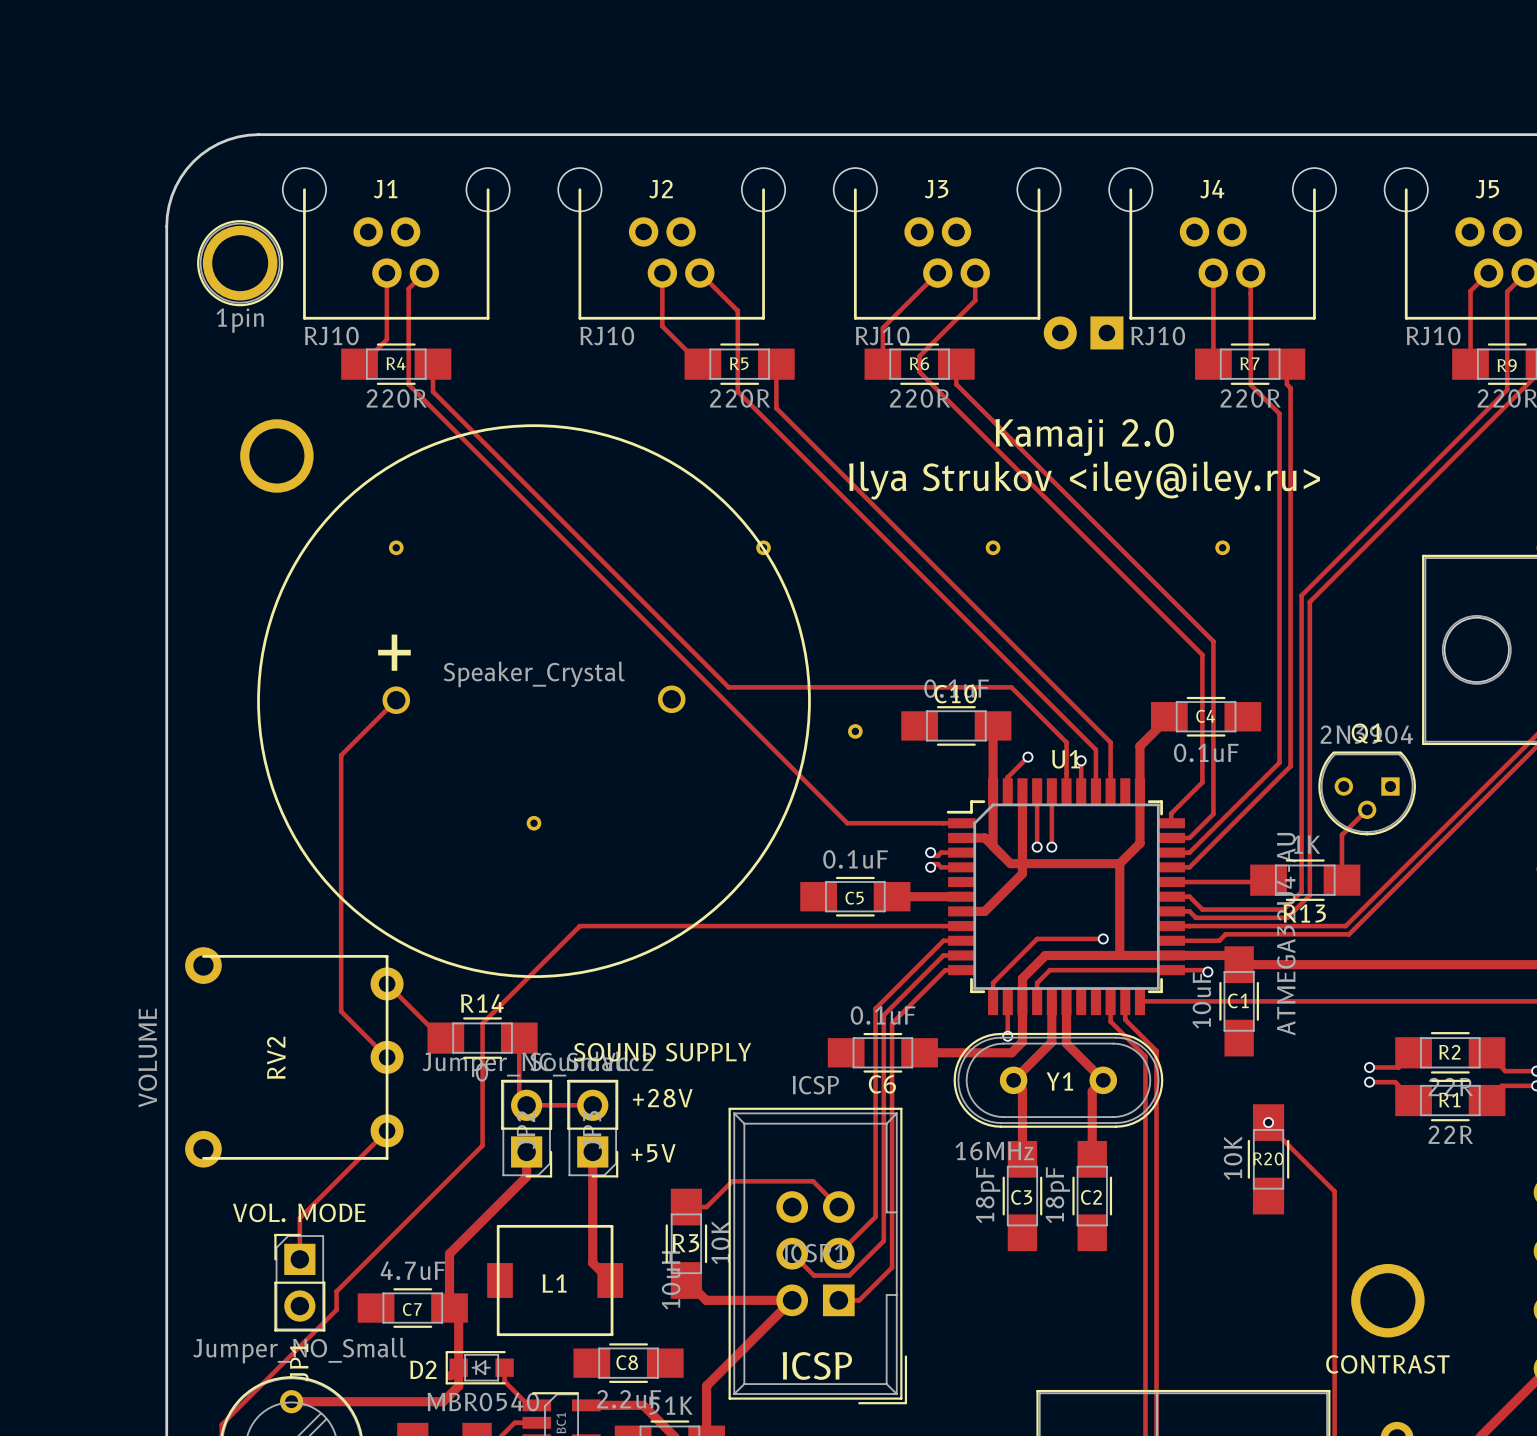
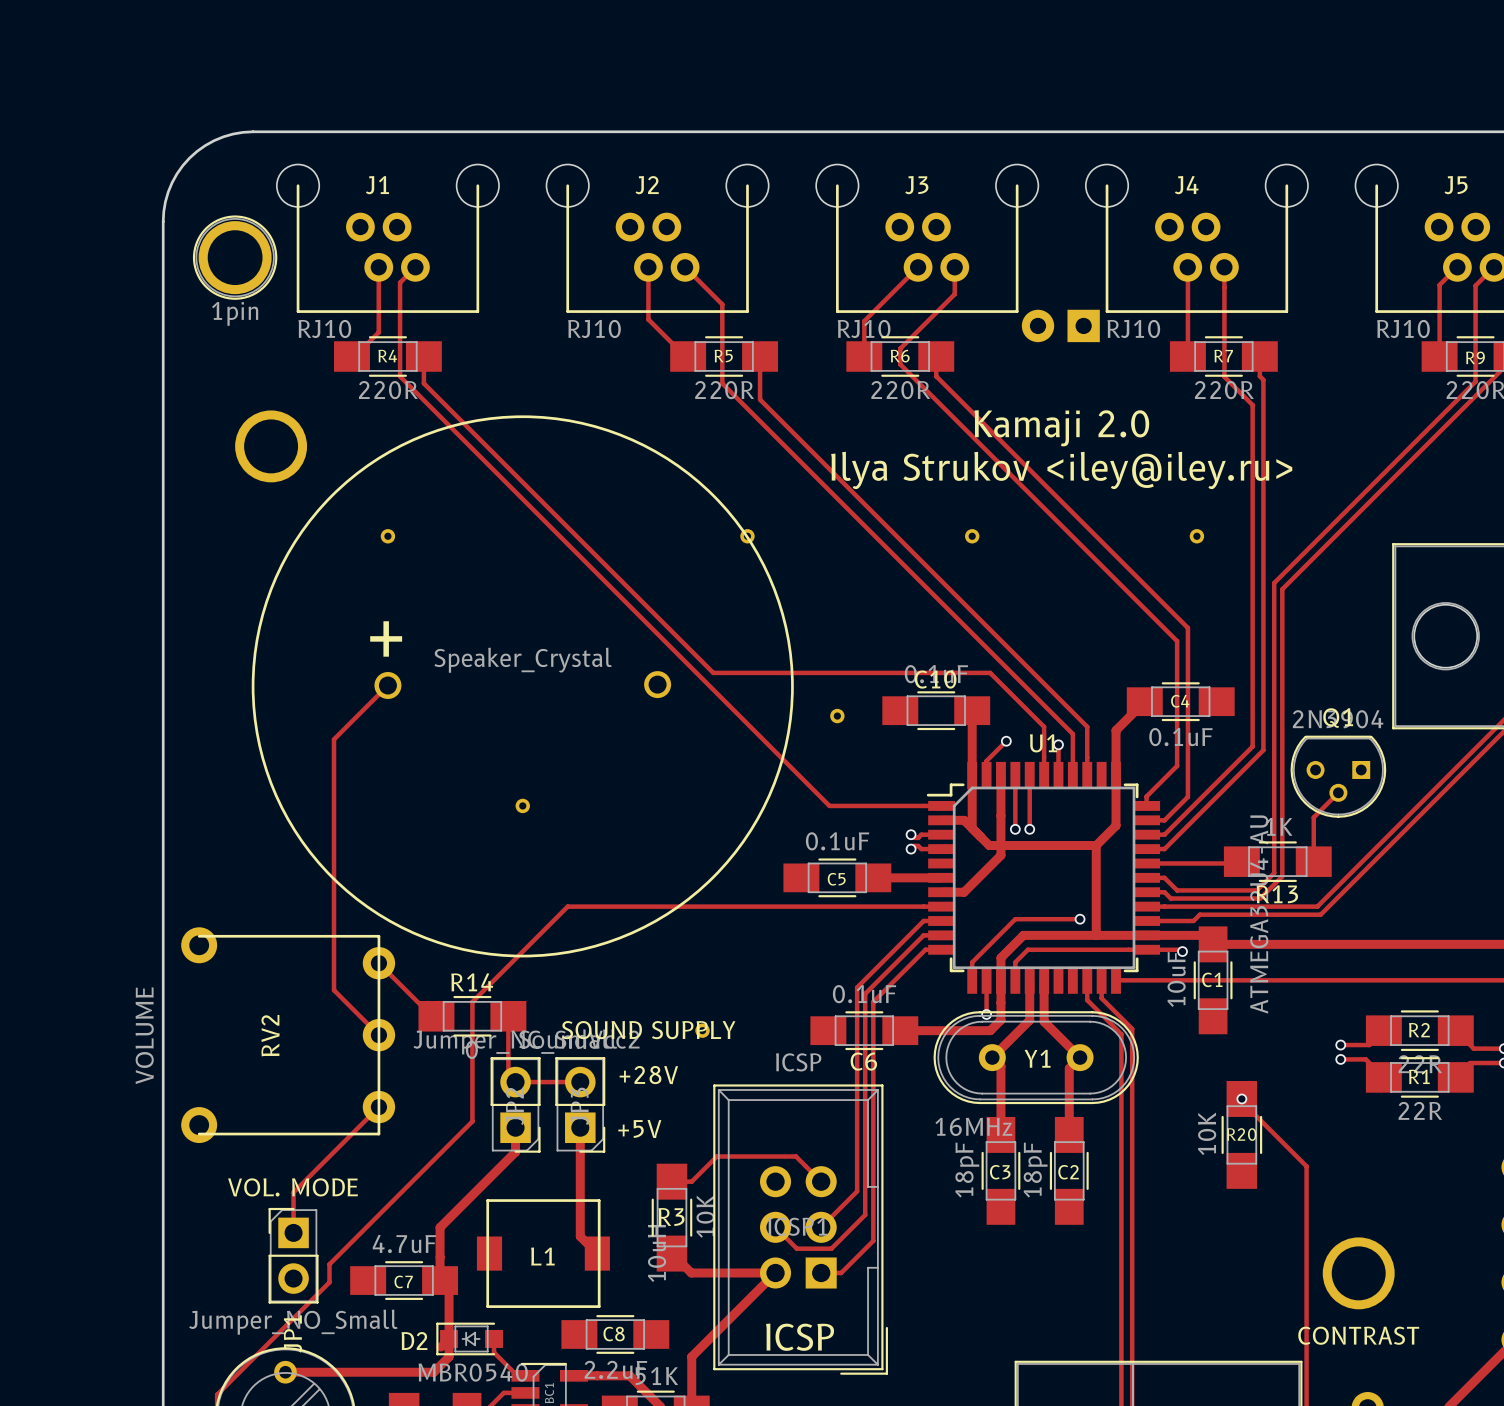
part: none -> (702, 1030)

